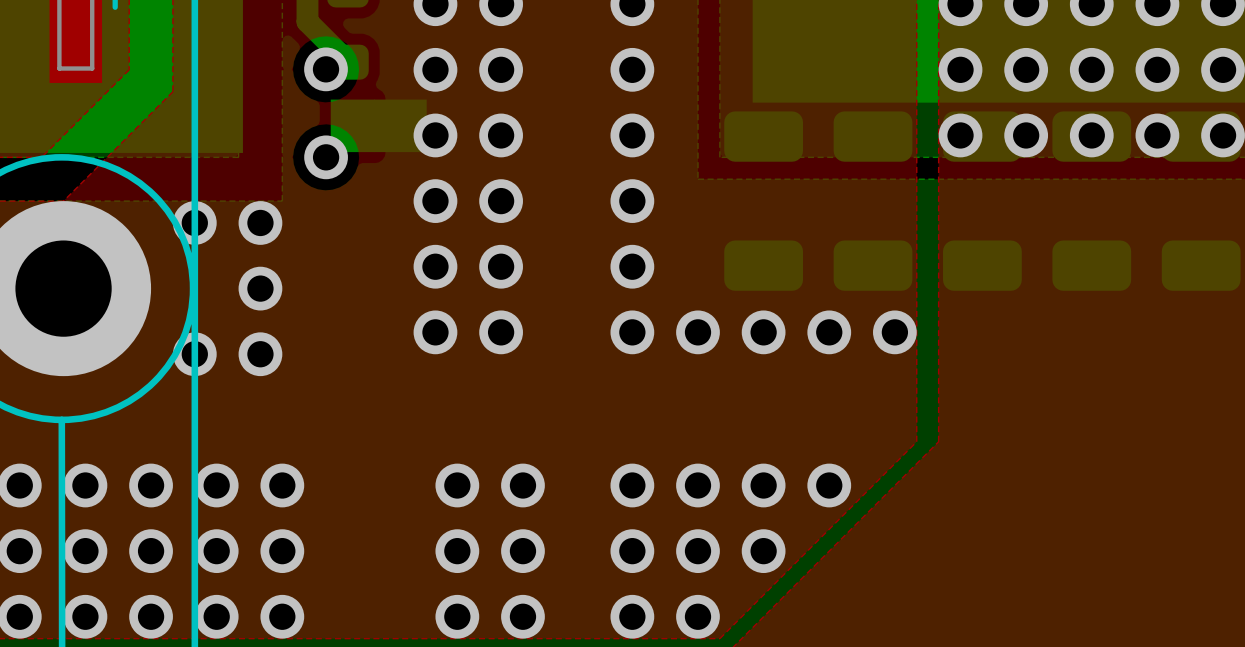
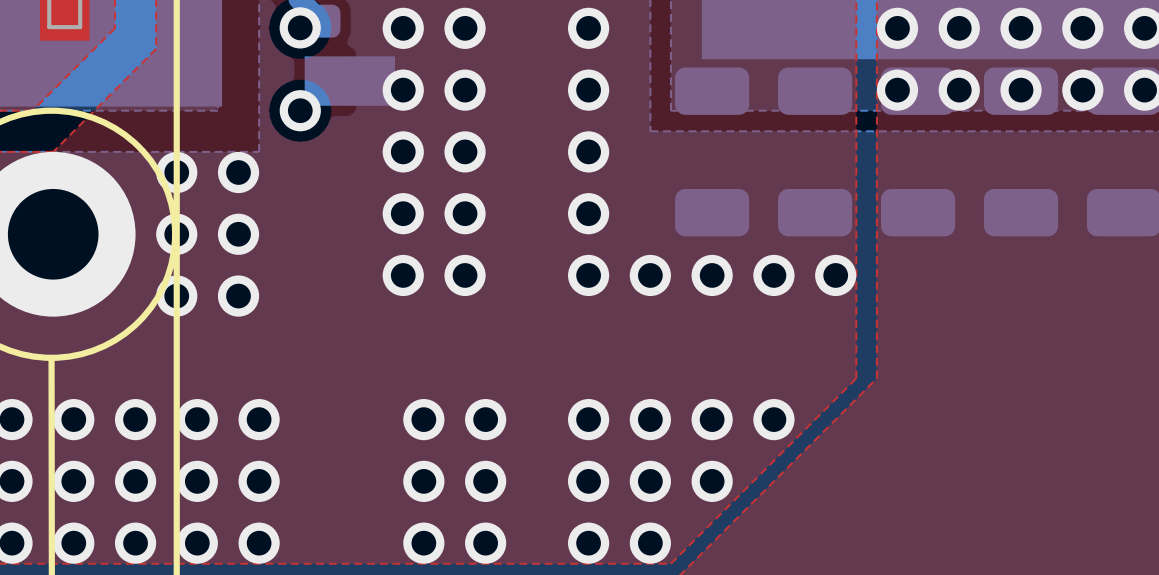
via: none -> (176, 234)

